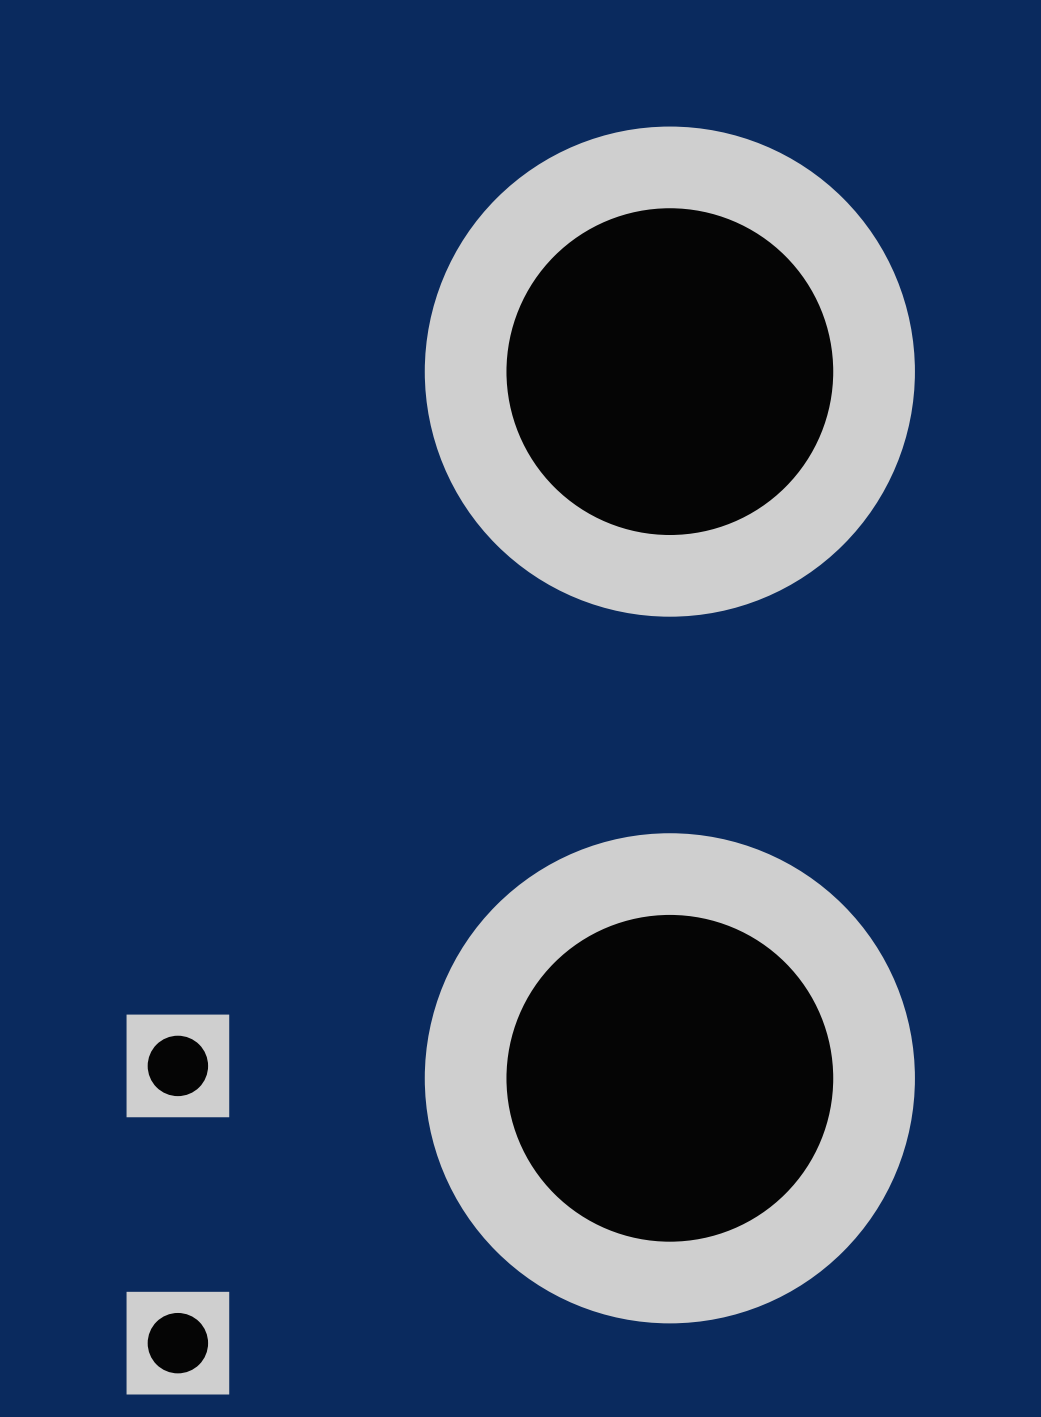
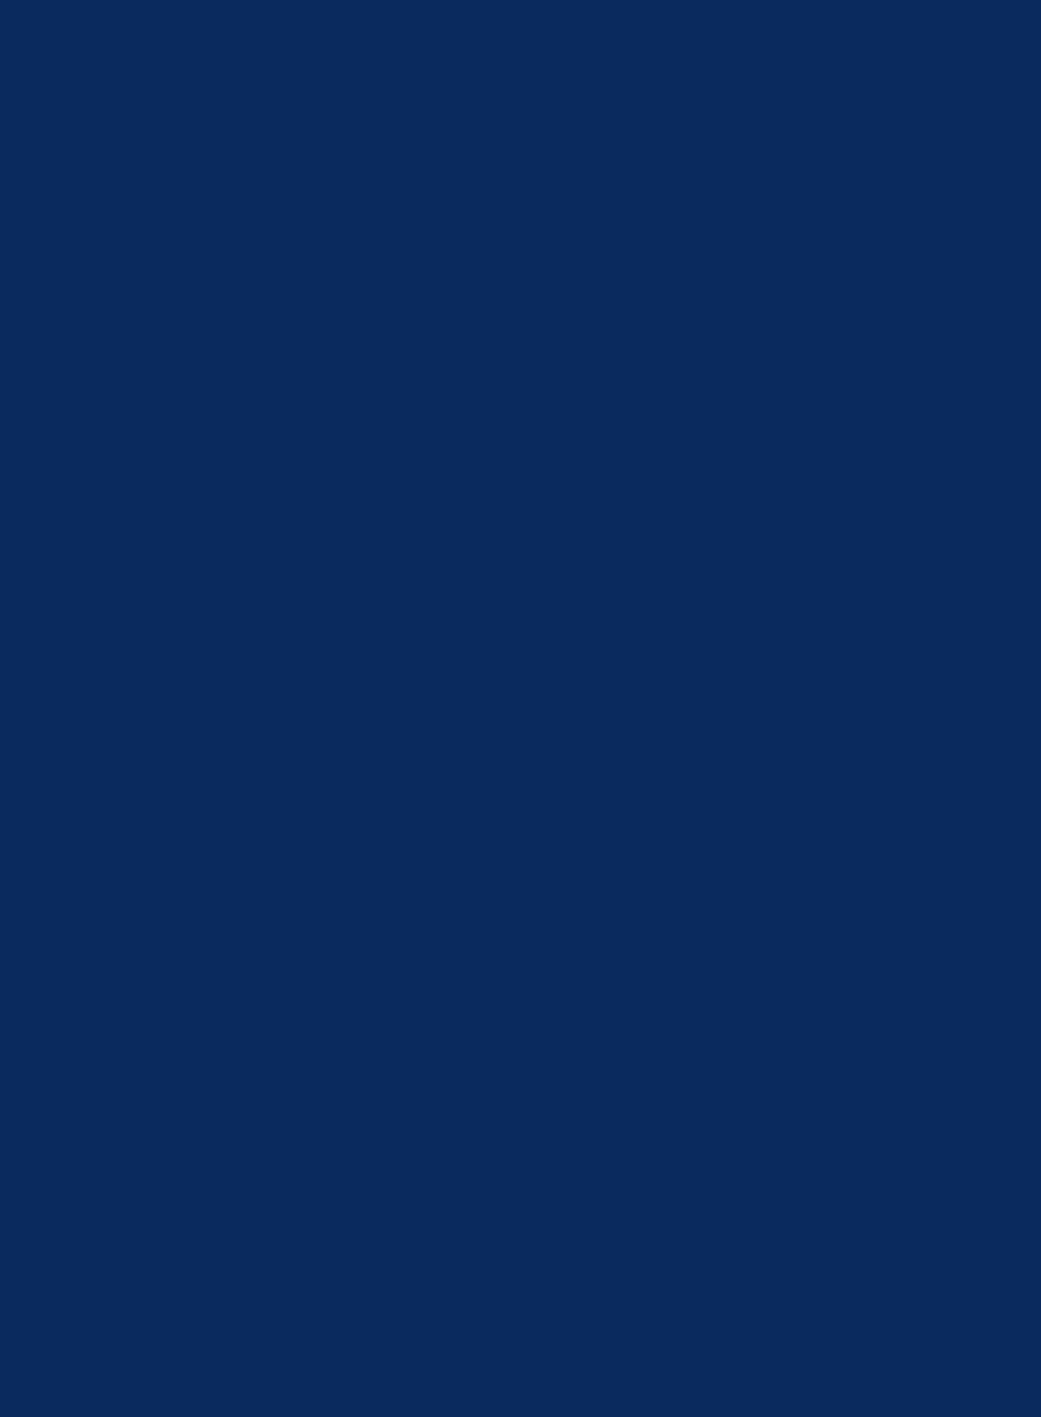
part: (669, 371) -> none
part: (177, 1065) -> none
part: (669, 1078) -> none
part: (177, 1343) -> none

